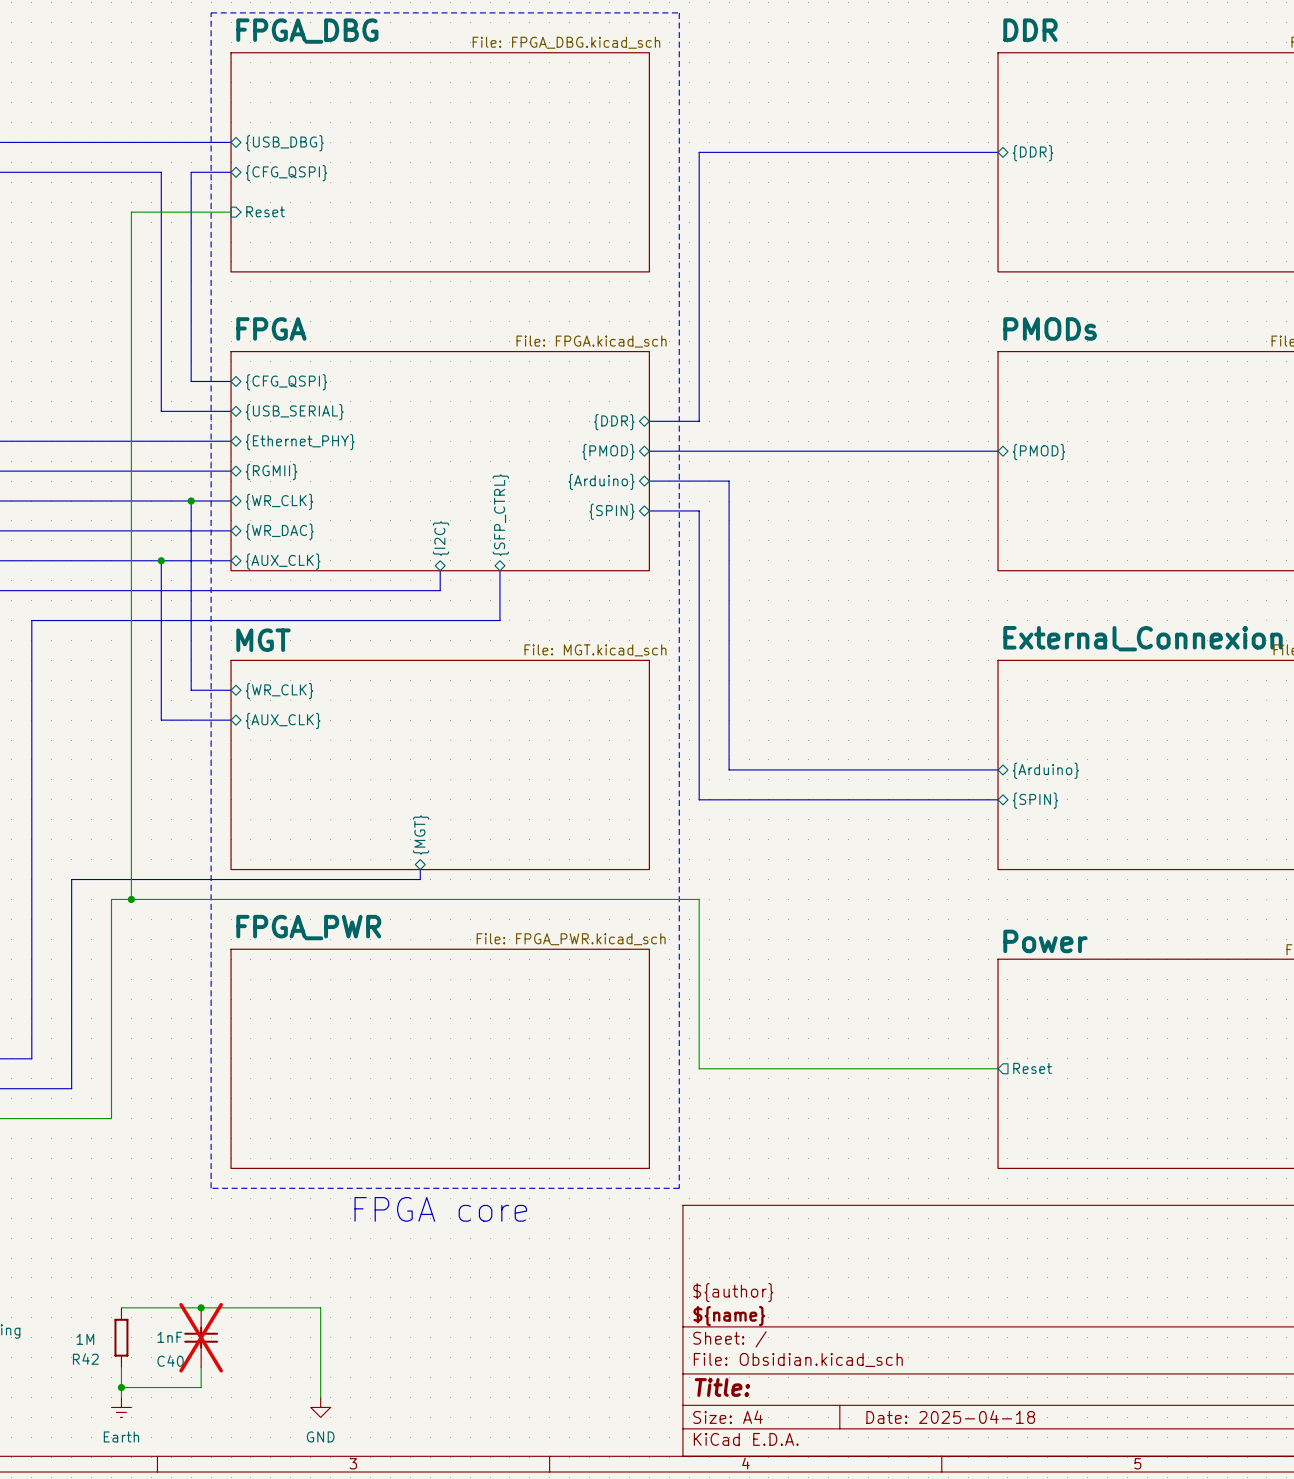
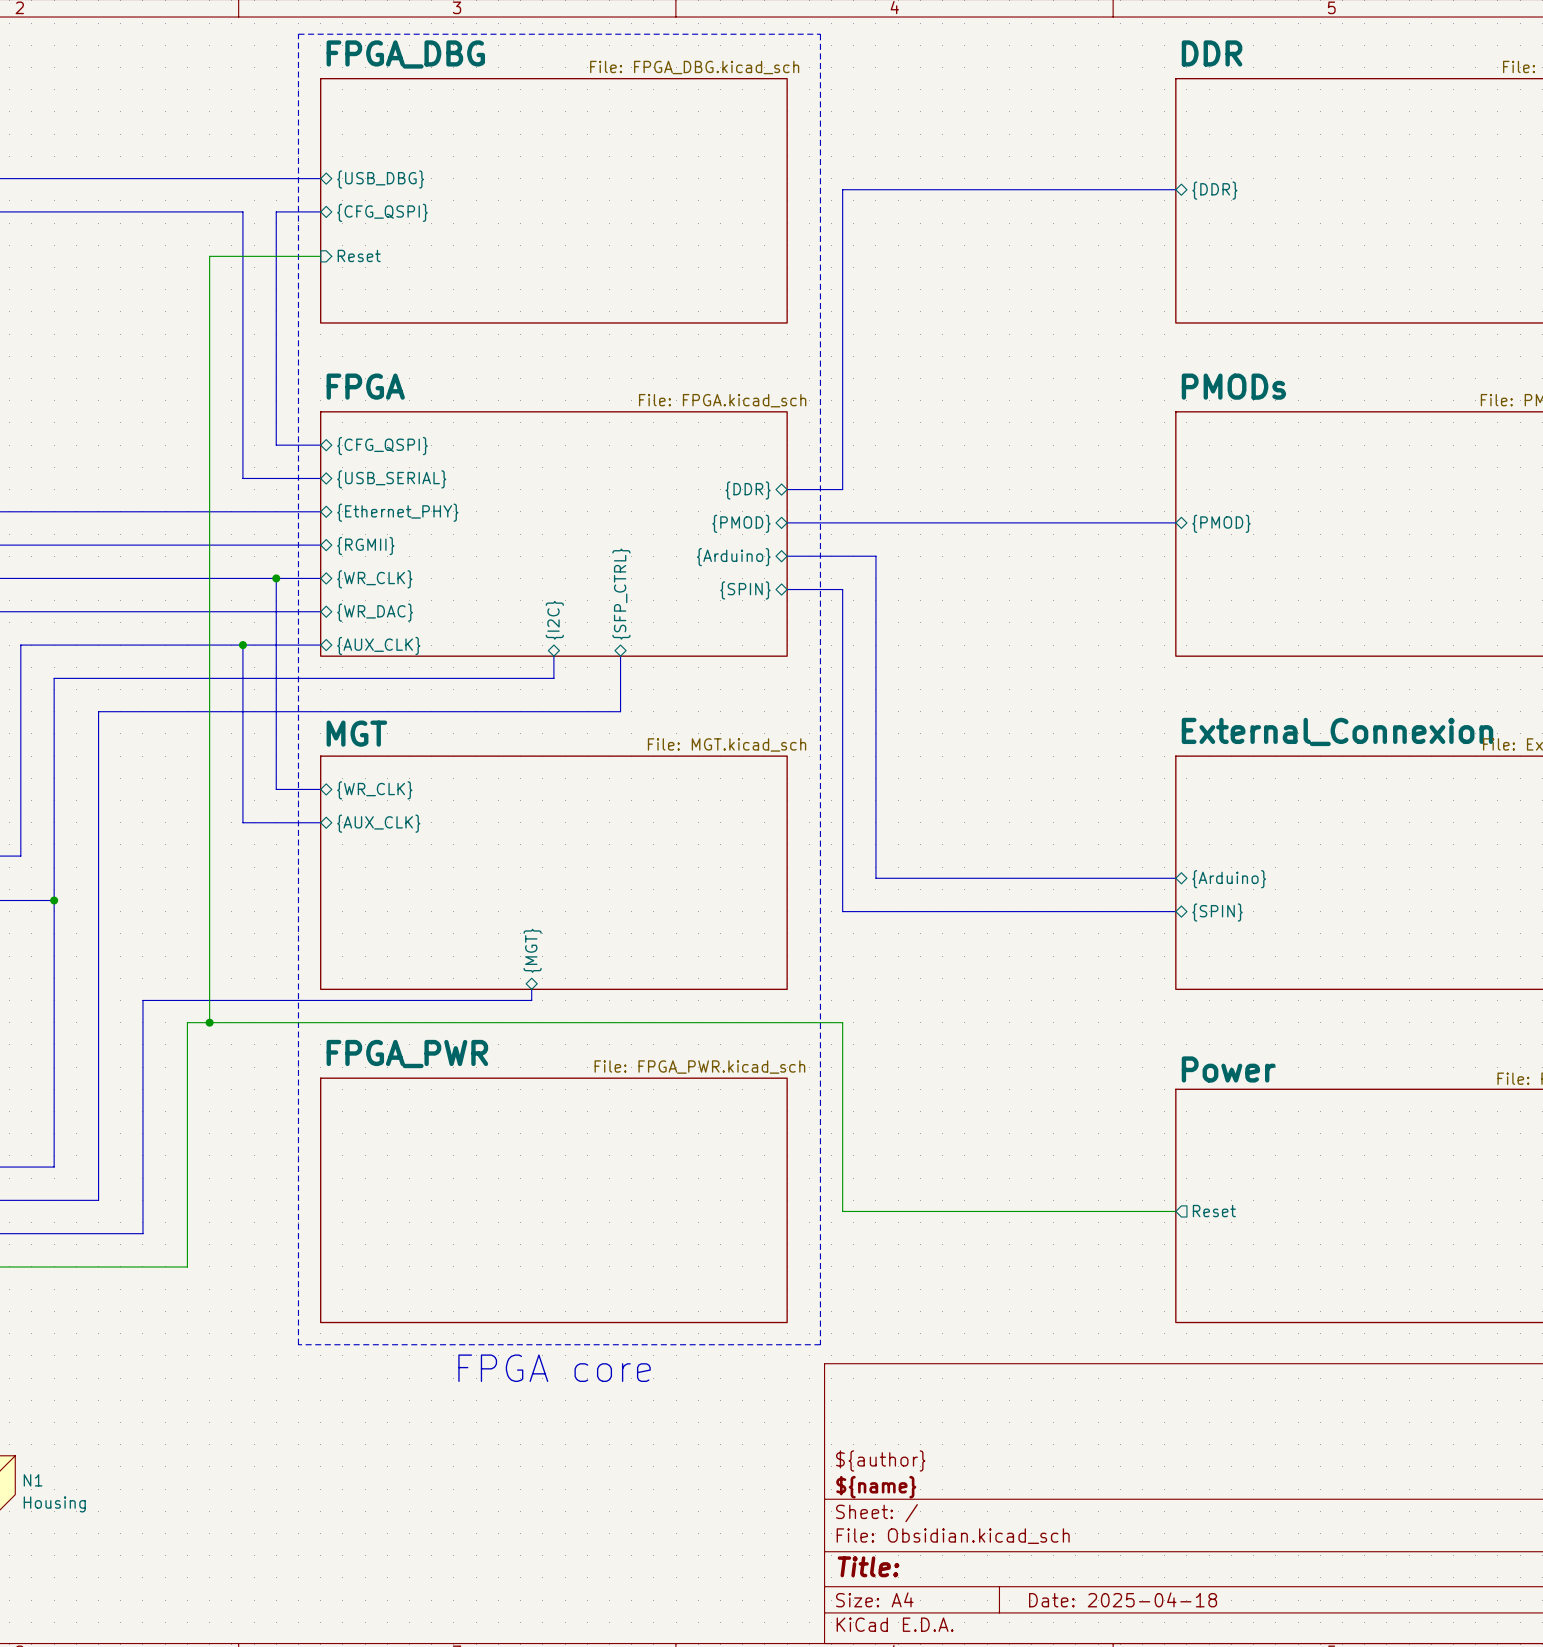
wire: (121, 1307) (320, 1307) (320, 1397) -> none
junction: (201, 1307) -> none
R42: (121, 1337) -> none
C40: (201, 1337) -> none
wire: (121, 1367) (121, 1397) -> none
wire: (201, 1367) (201, 1387) (121, 1387) -> none
junction: (121, 1387) -> none
power symbol: Earth (121, 1407) -> none
power symbol: GND (320, 1407) -> none

